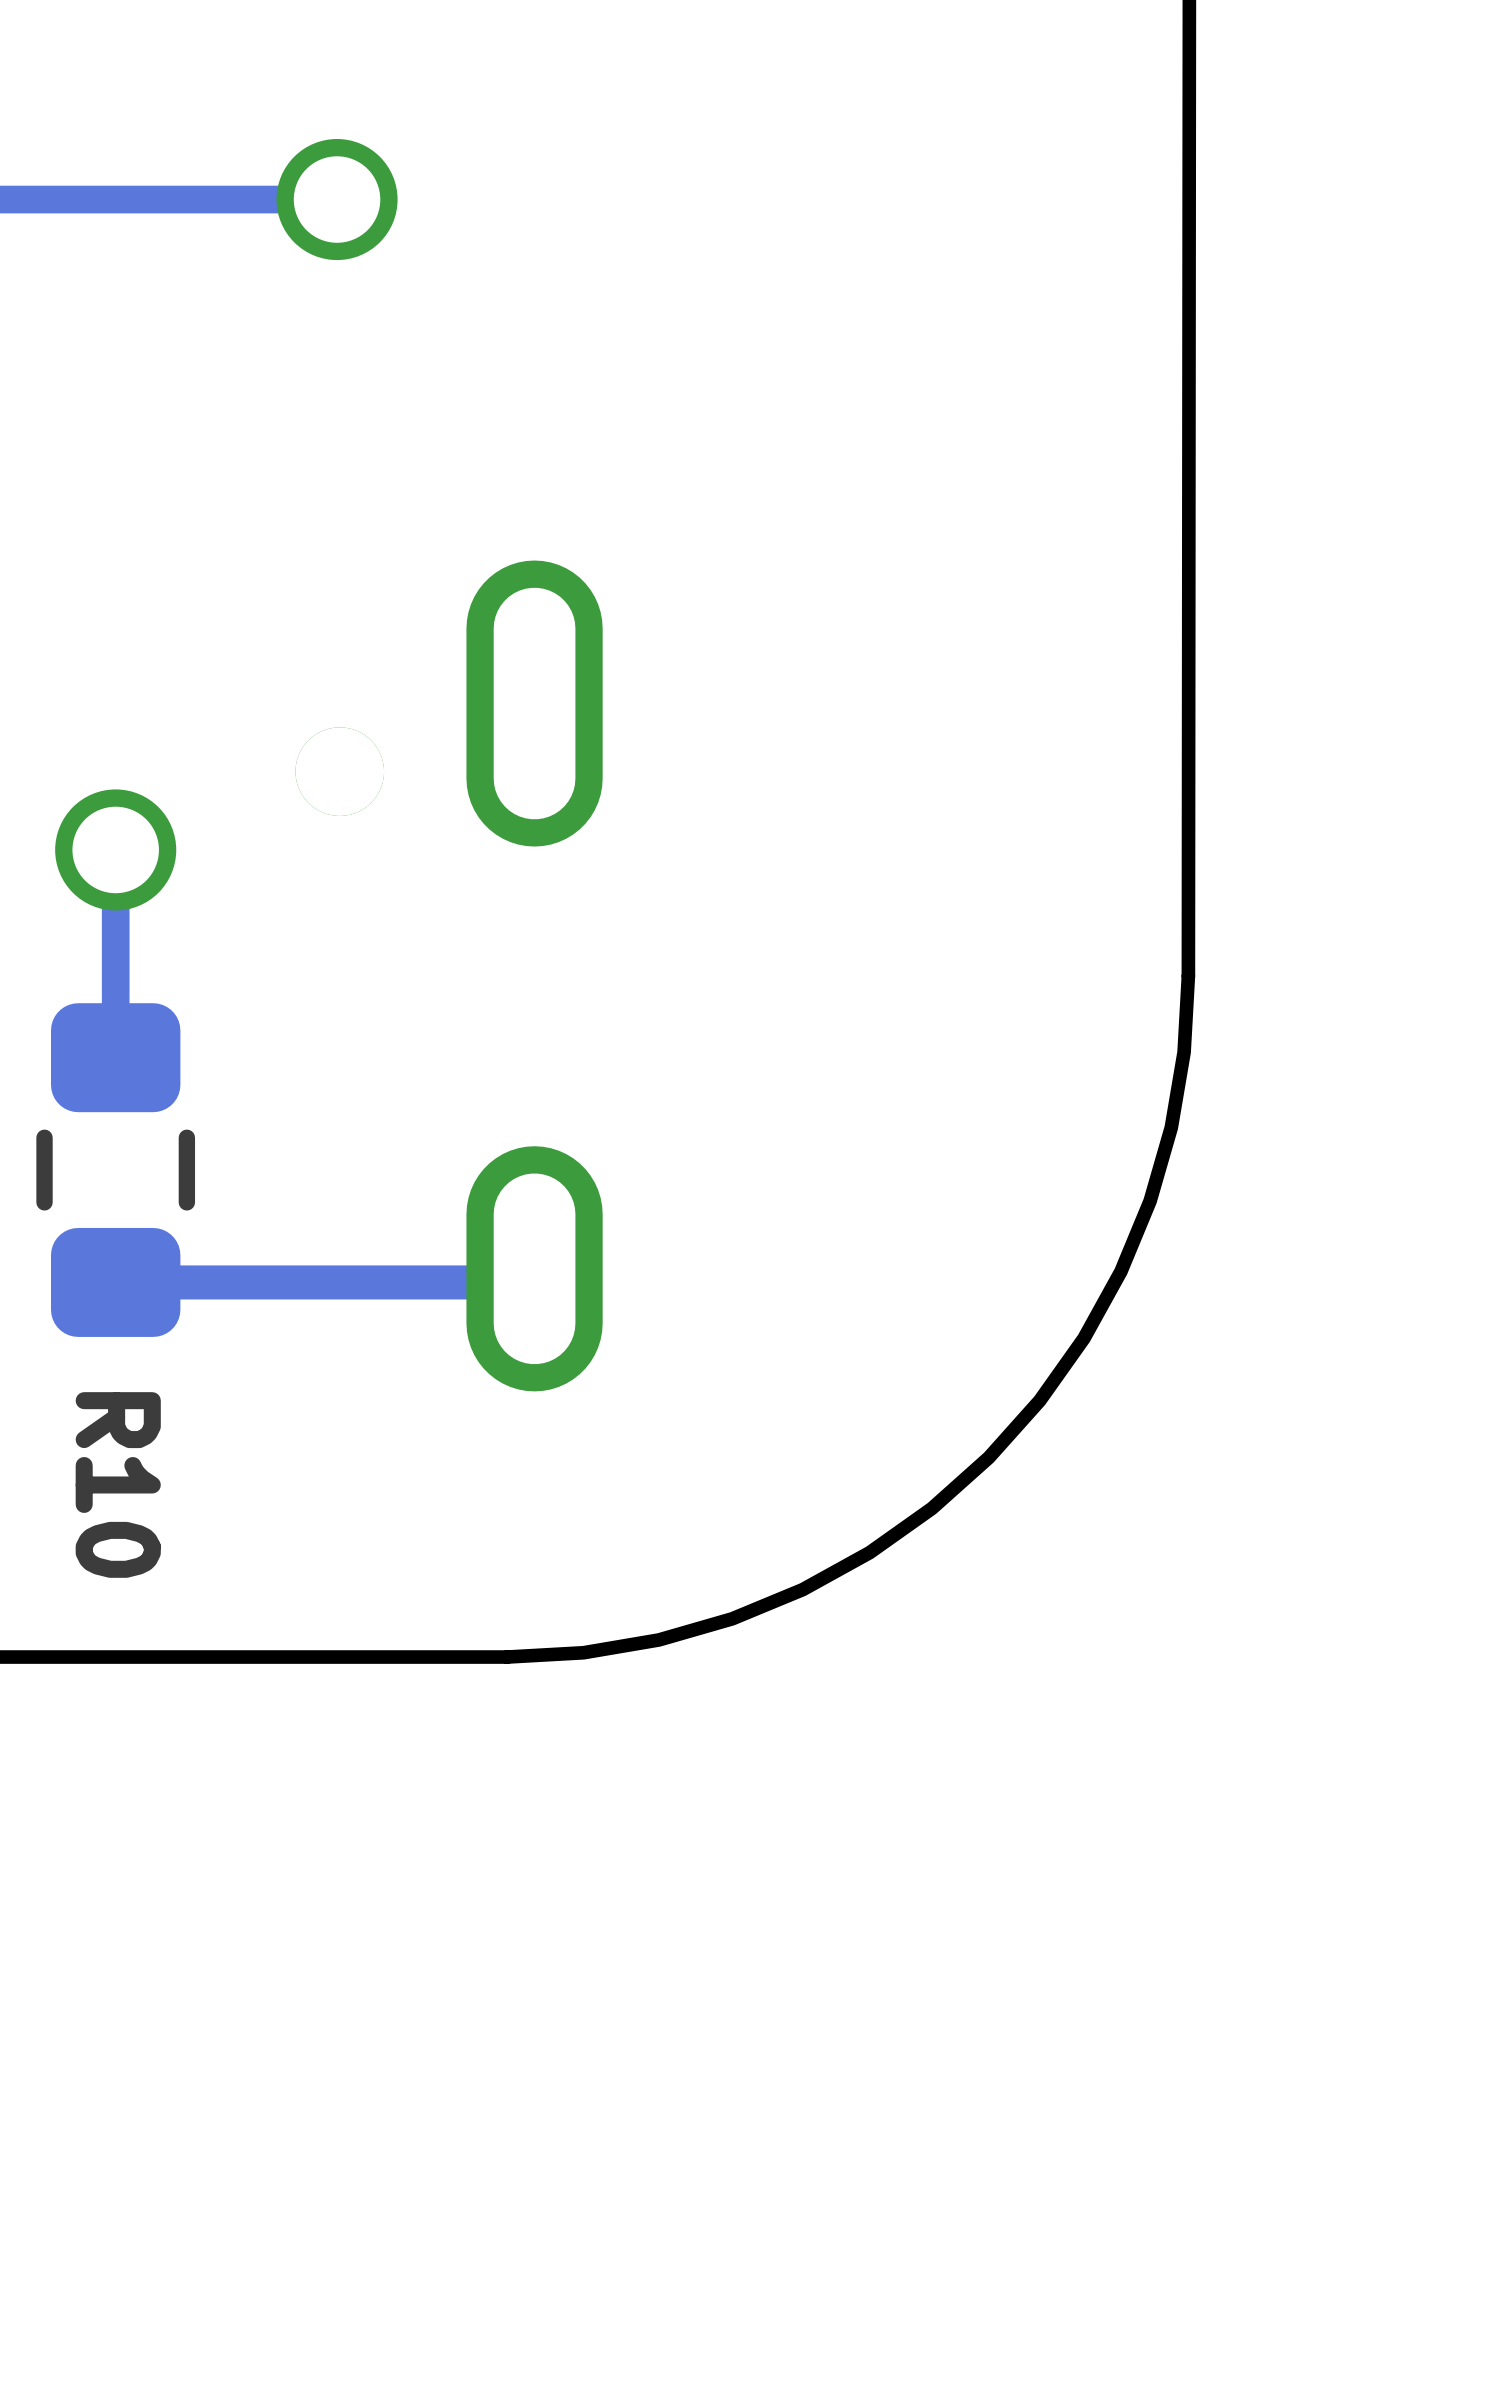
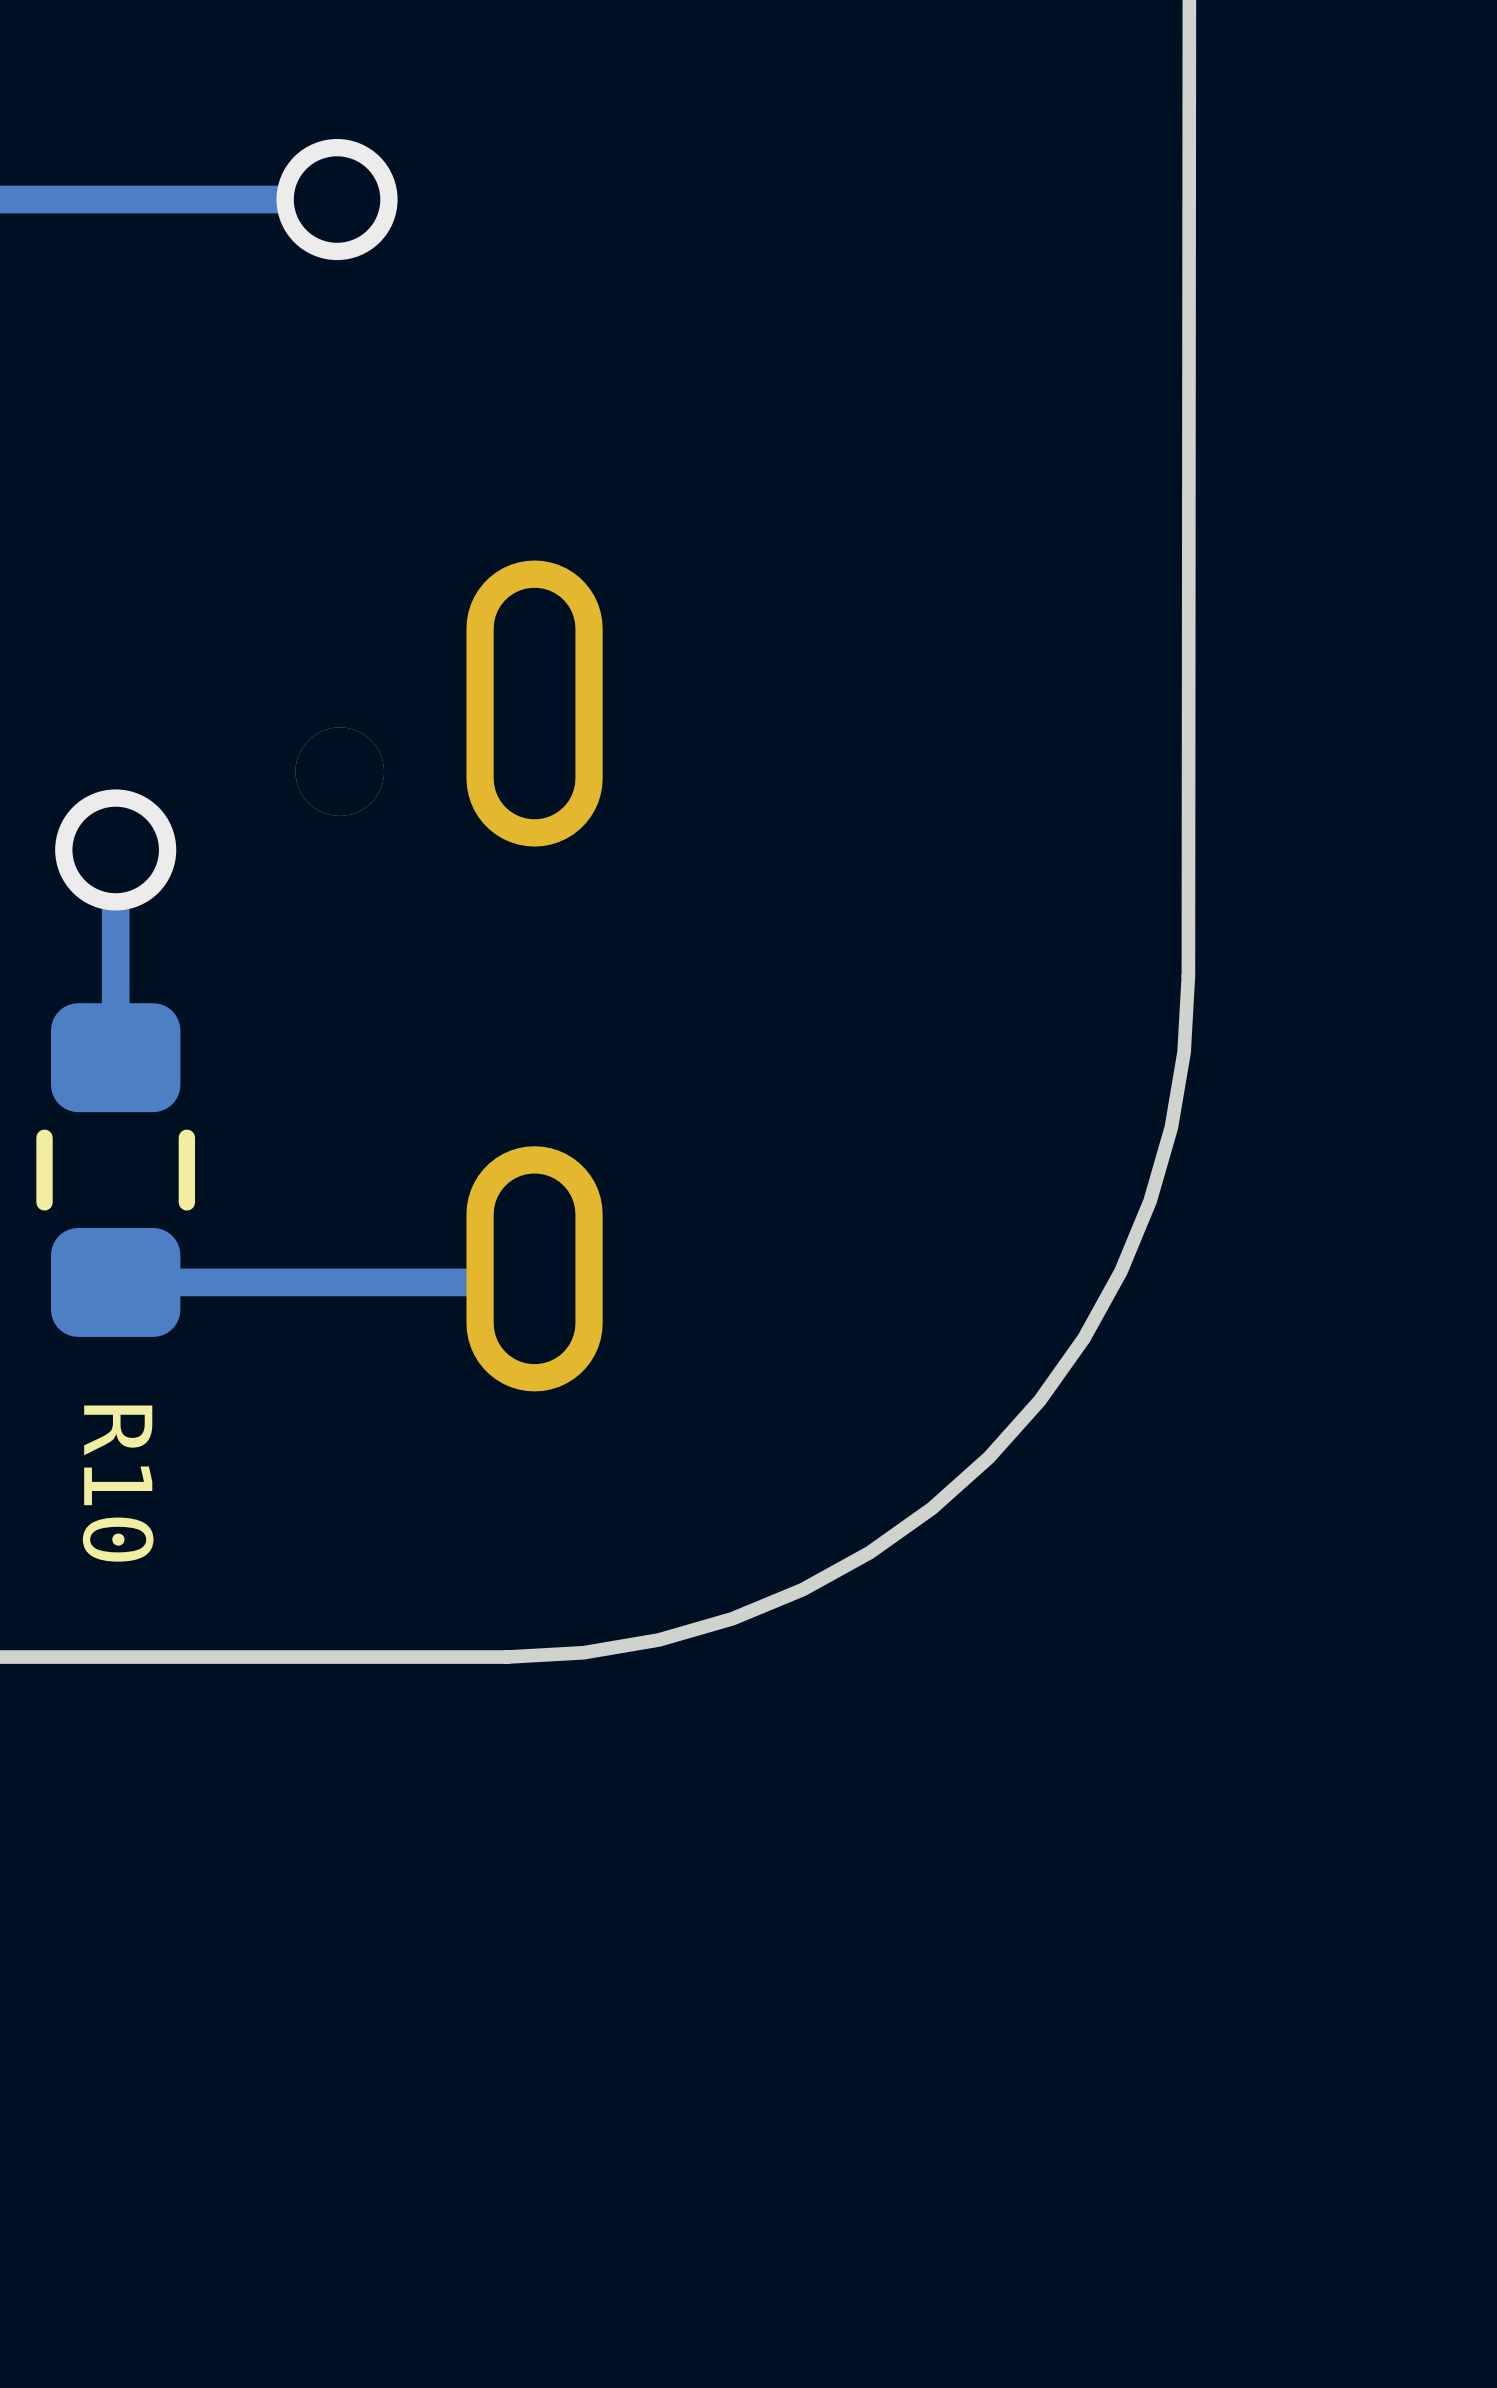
track width: thick (534, 1268) (520, 1282) (115, 1282) -> thin (534, 1268) (520, 1282) (115, 1282)

